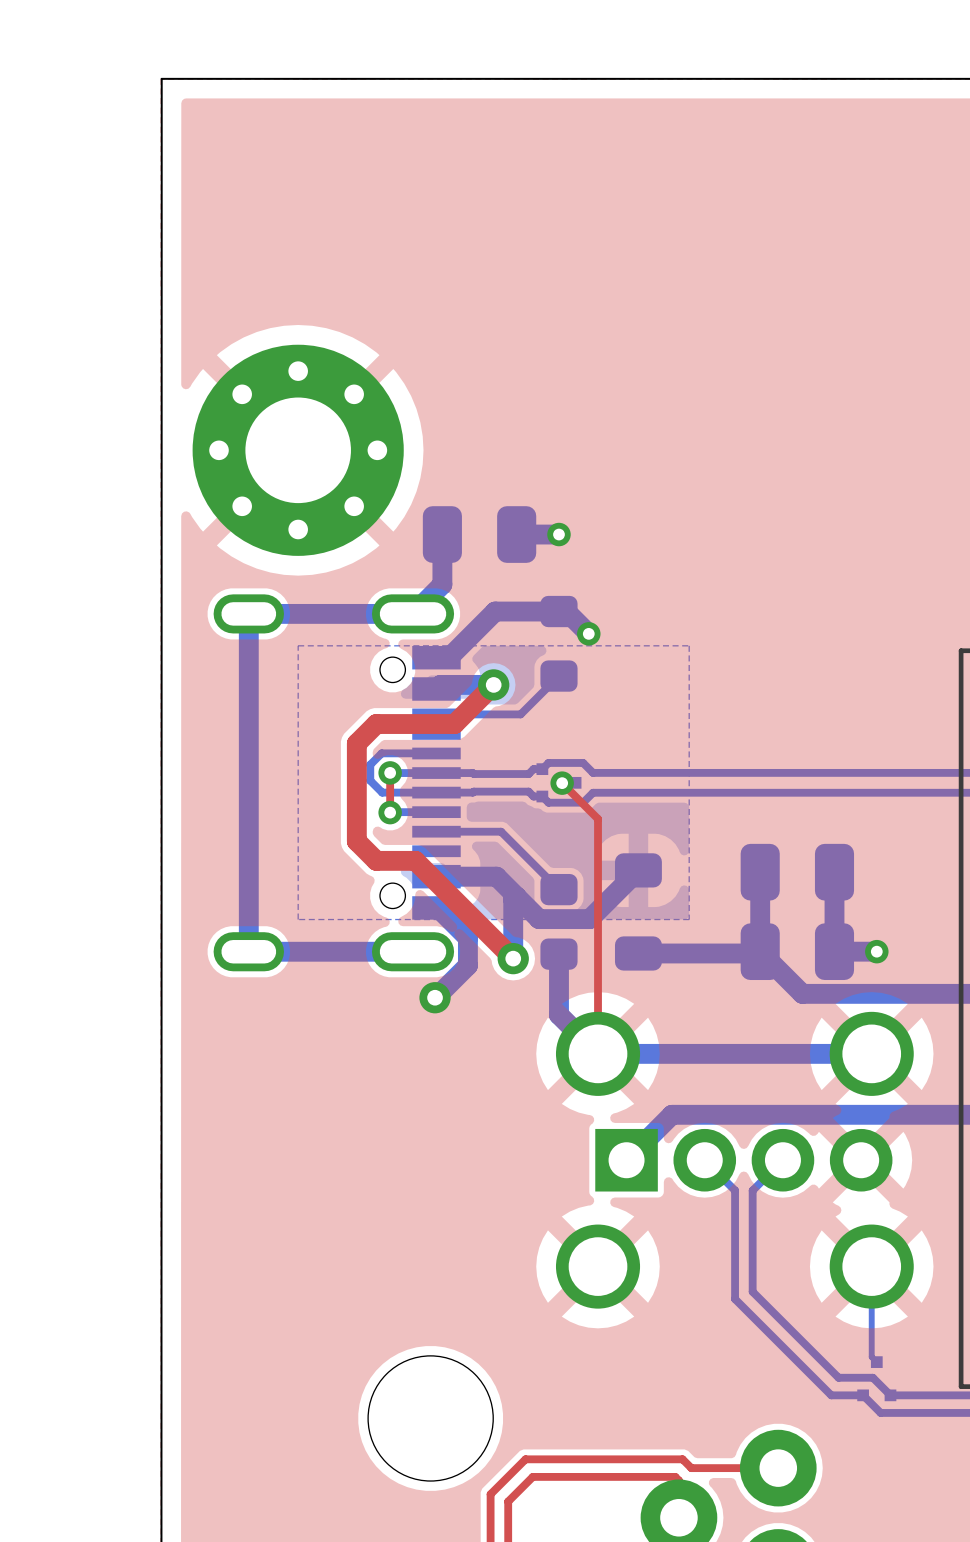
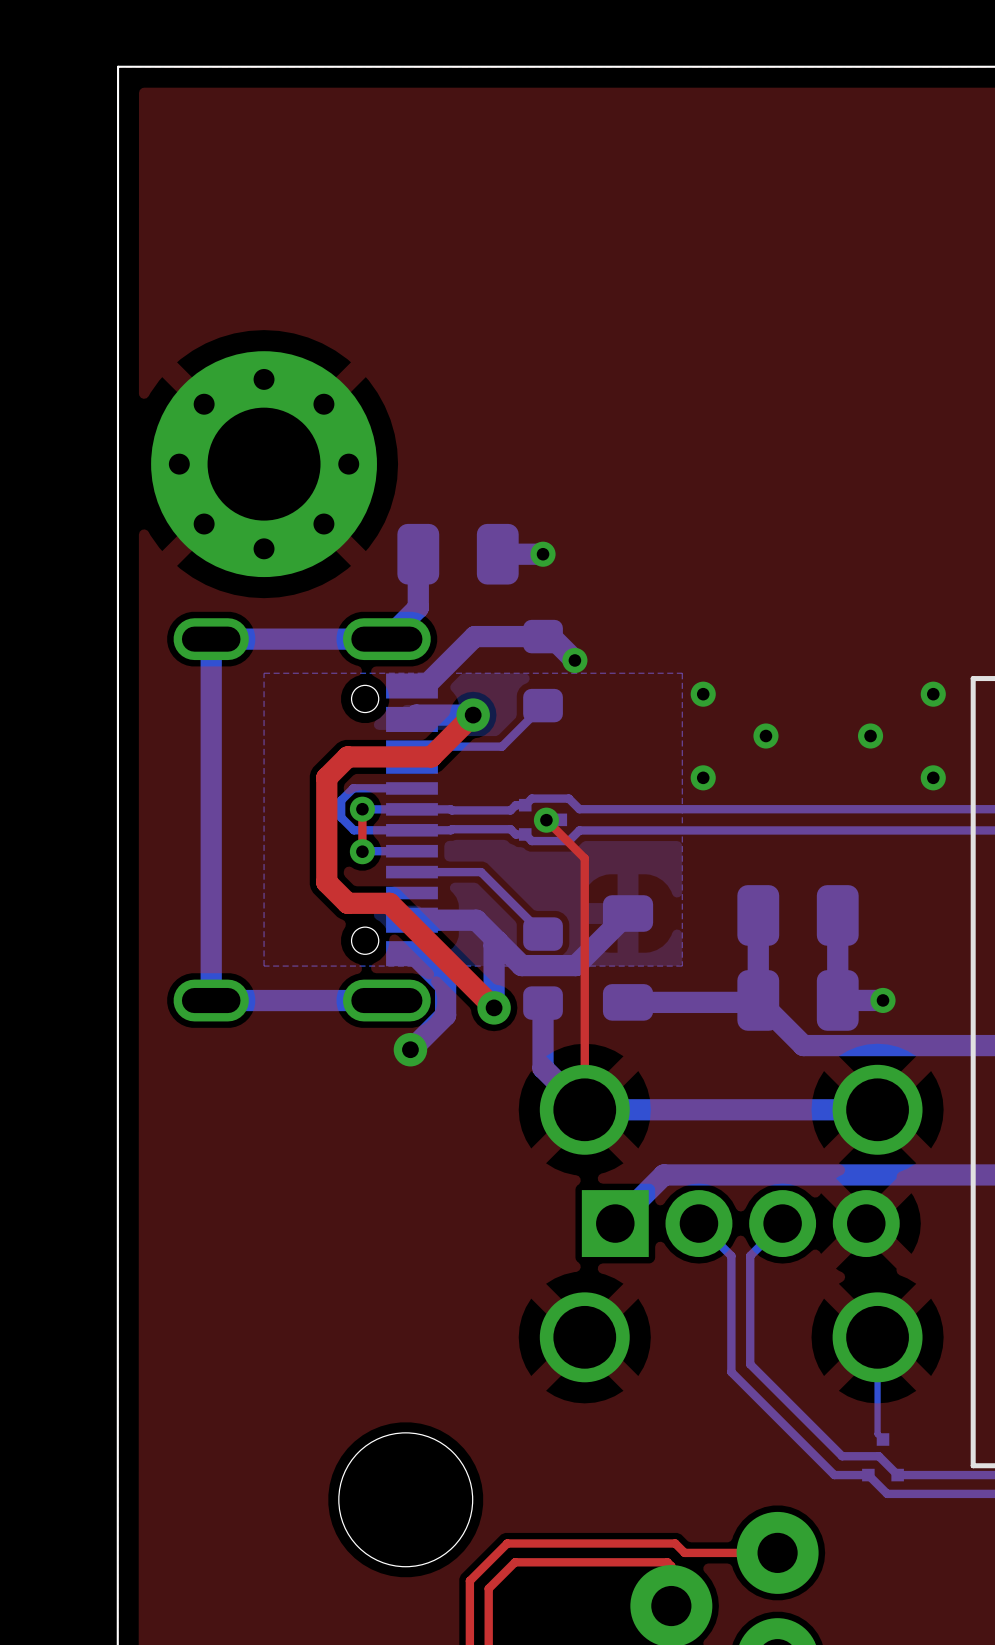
via: none -> (703, 694)
via: none -> (933, 694)
via: none -> (765, 736)
via: none -> (870, 736)
via: none -> (703, 777)
via: none -> (933, 777)

